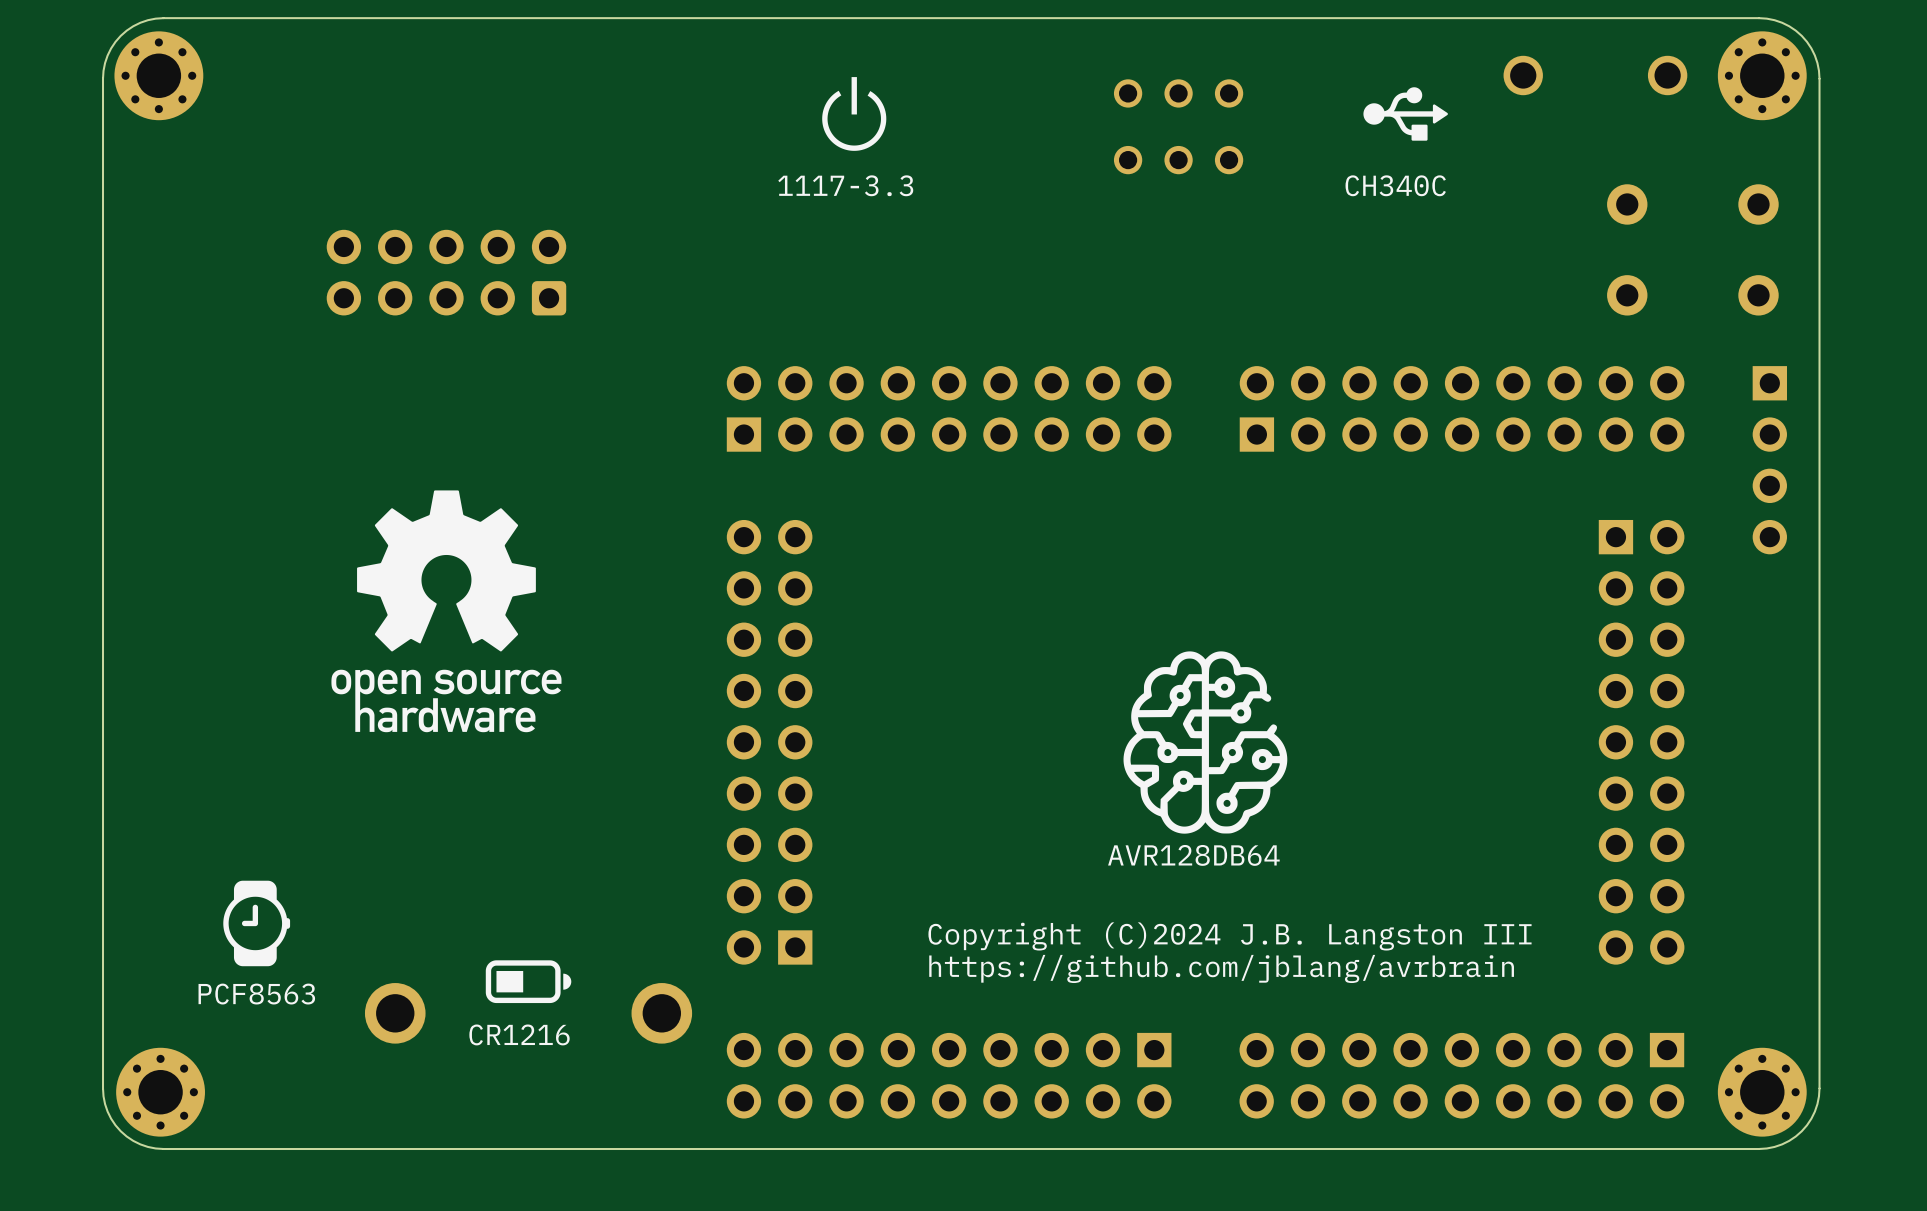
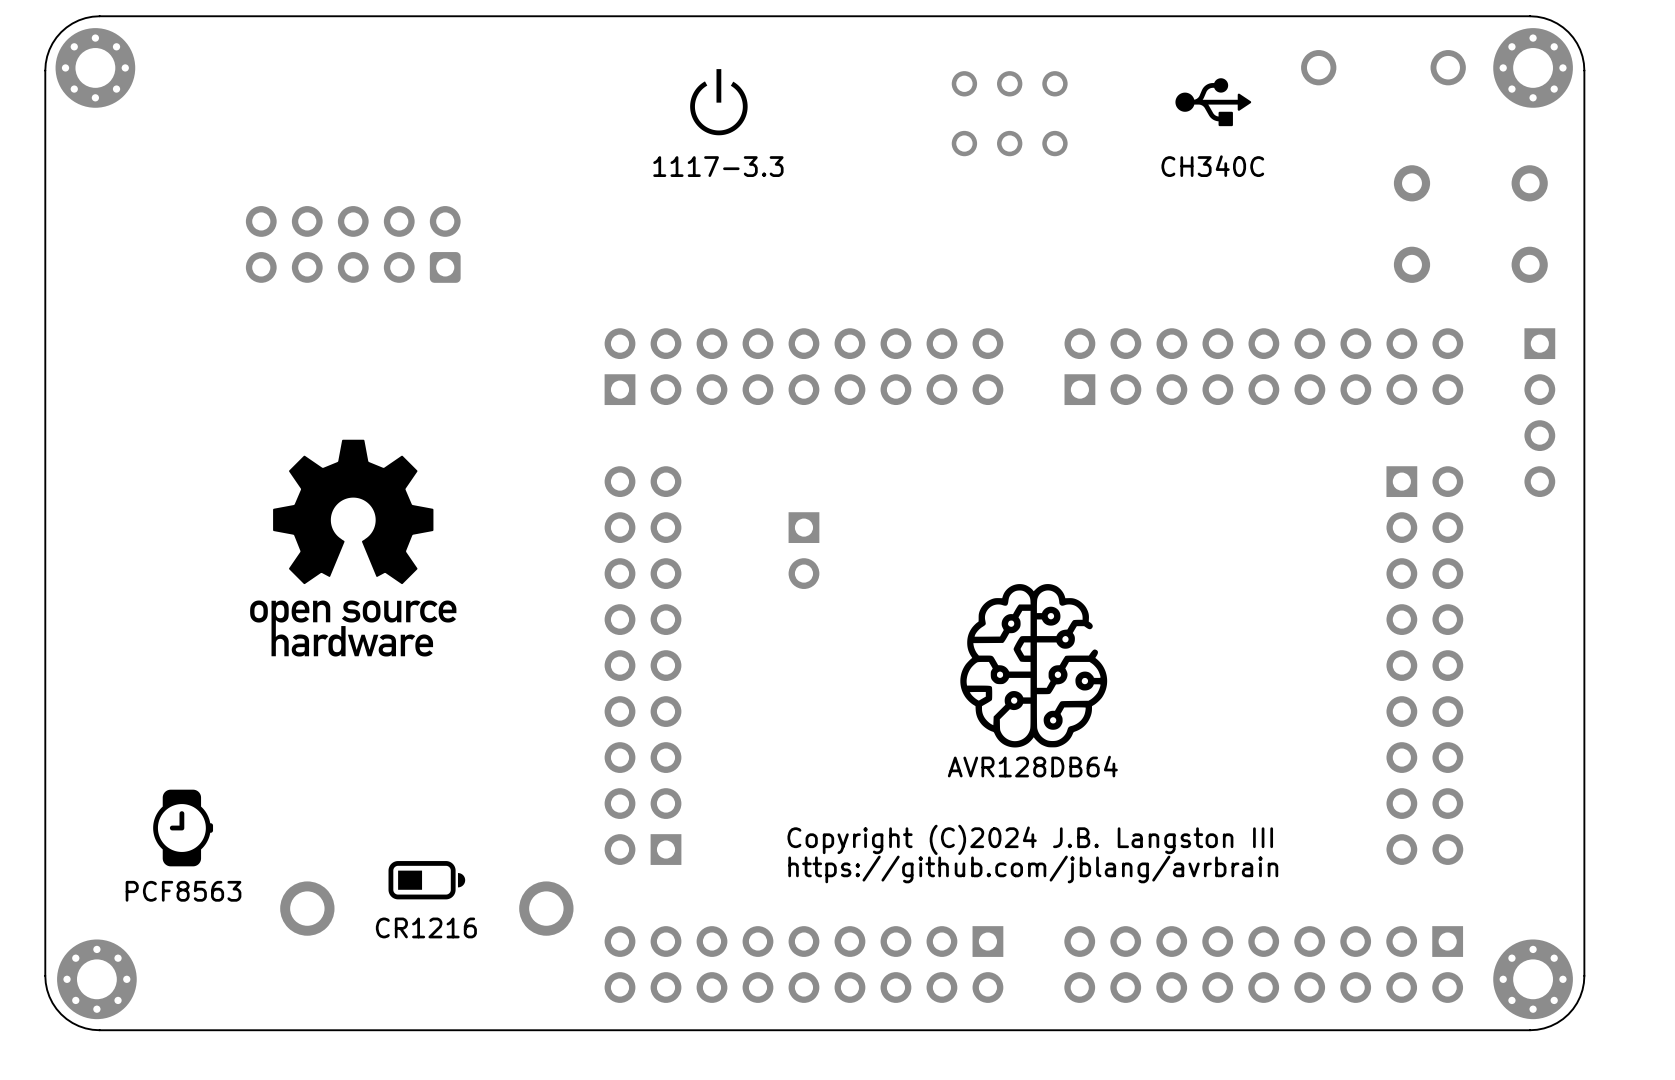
part: none -> (803, 550)

